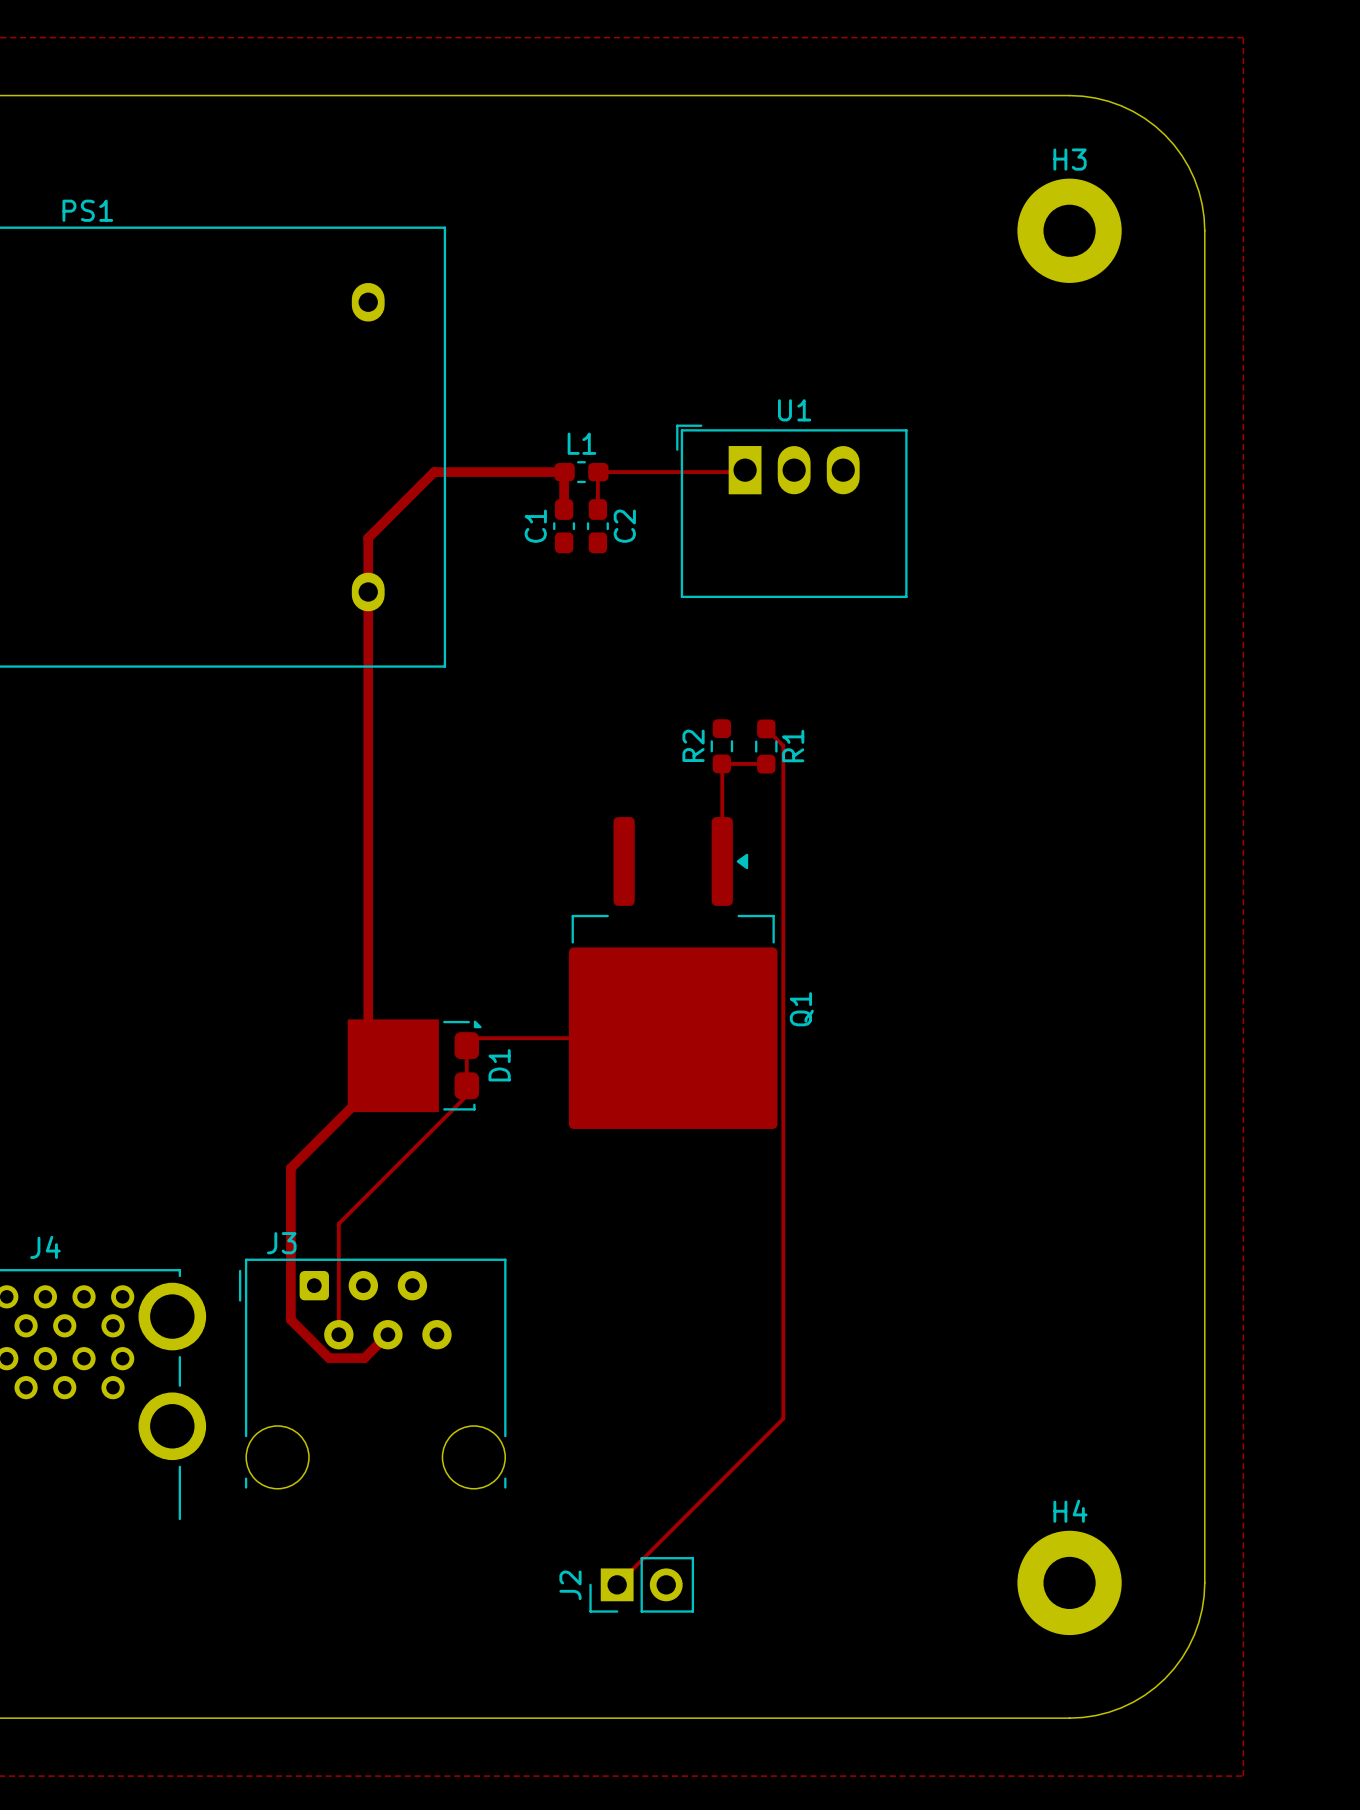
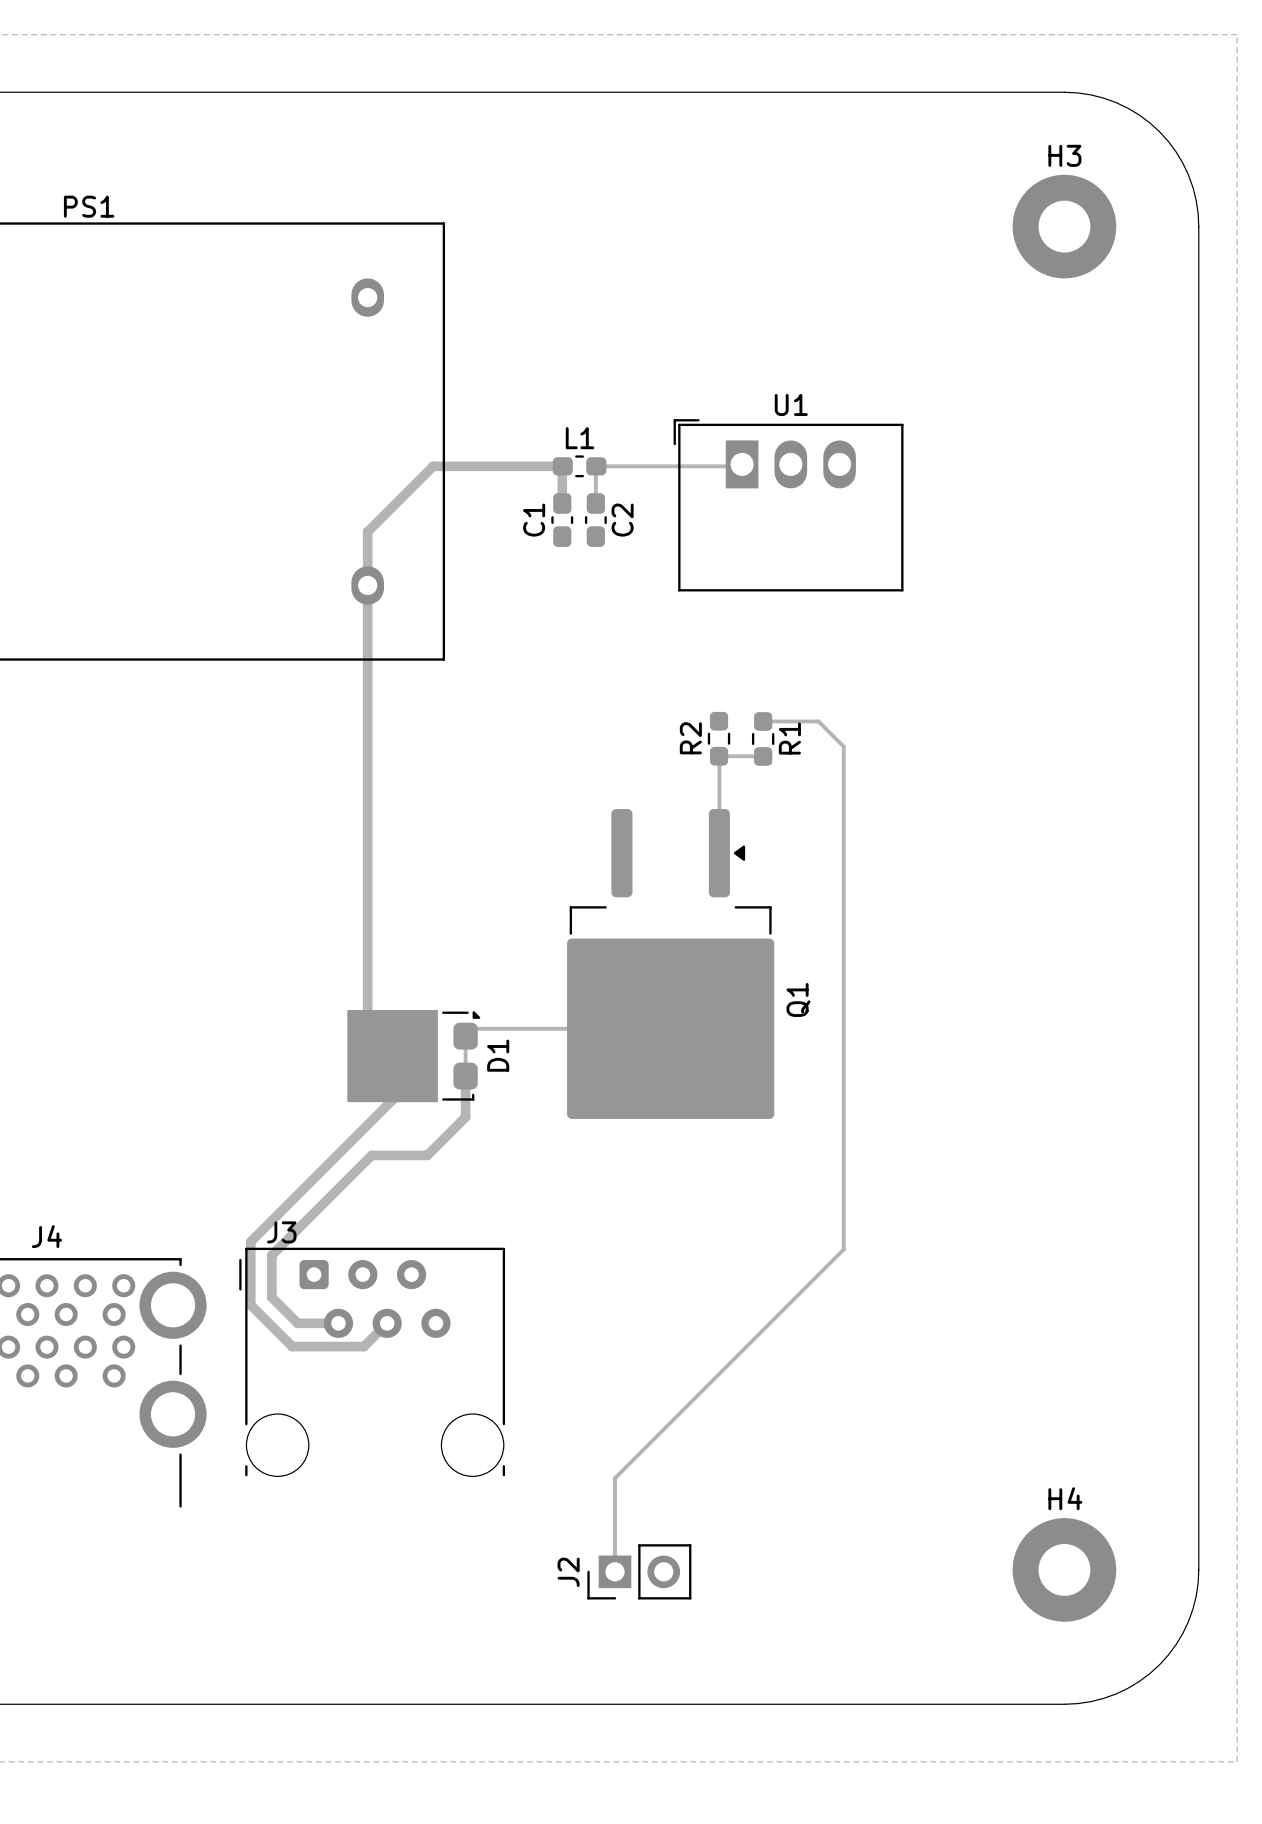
track: (766, 728) (783, 745) (783, 1418) (617, 1584) -> (763, 721) (818, 721) (843, 746) (843, 1249) (615, 1478) (615, 1571)
track: (393, 1065) (290, 1168) (290, 1319) (329, 1358) -> (392, 1056) (392, 1099) (250, 1241) (250, 1305) (292, 1346) (328, 1346)
track: (466, 1095) (338, 1223) (338, 1334) -> (465, 1076) (465, 1117) (427, 1155) (371, 1155) (271, 1255) (271, 1297) (297, 1323) (338, 1323)

